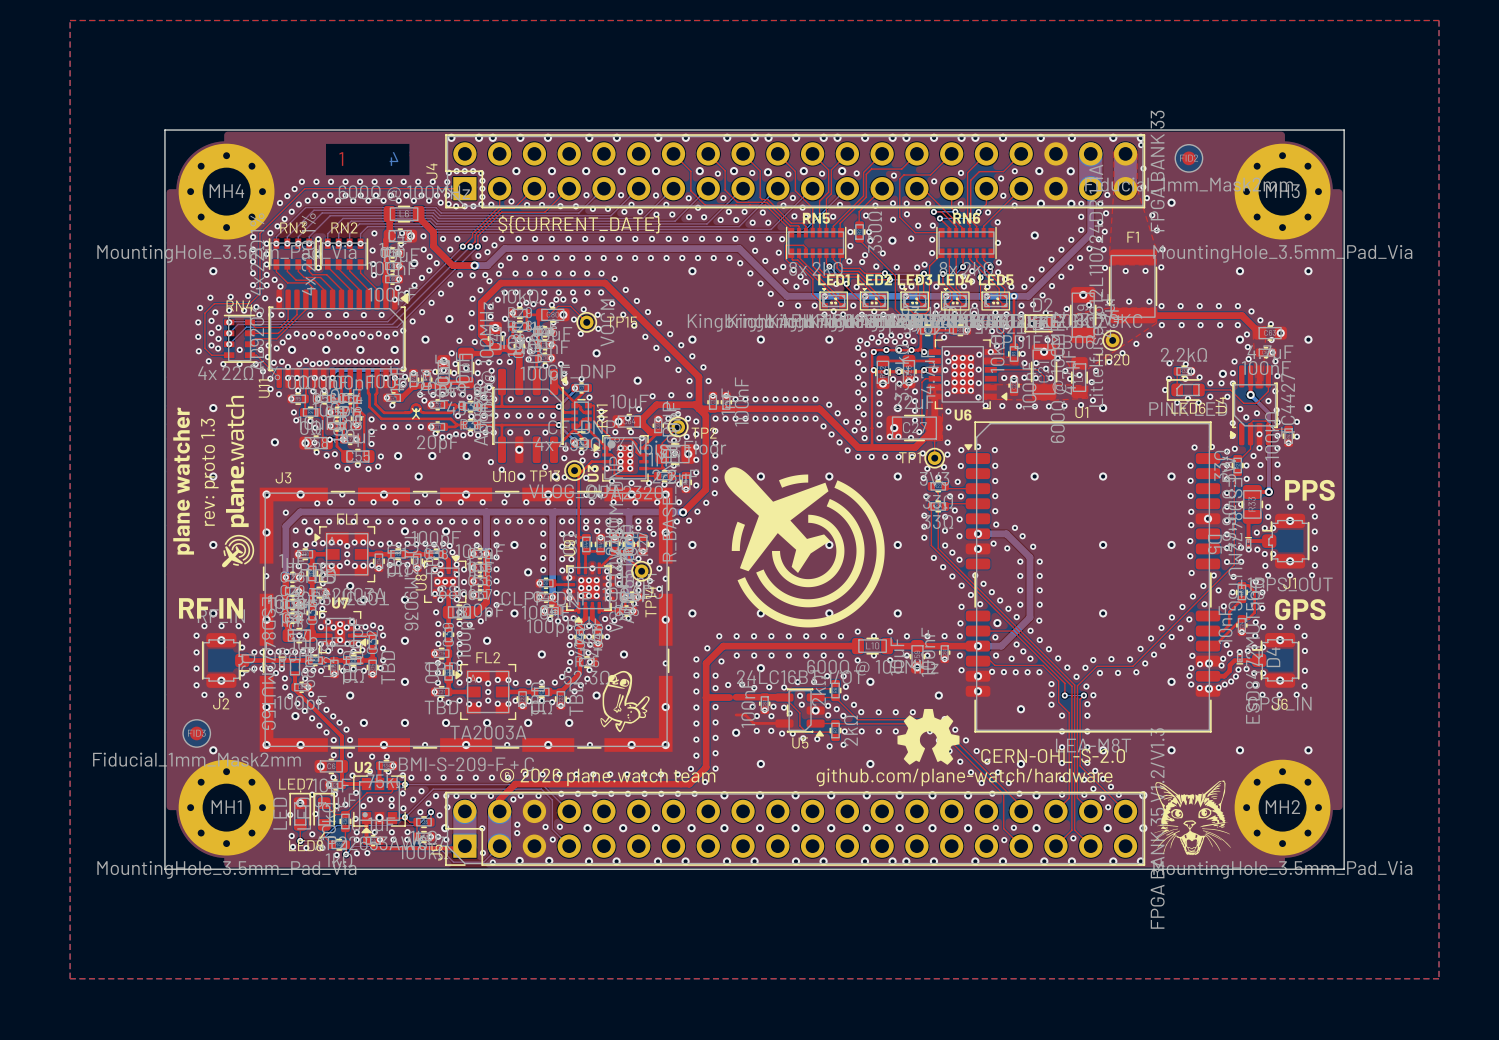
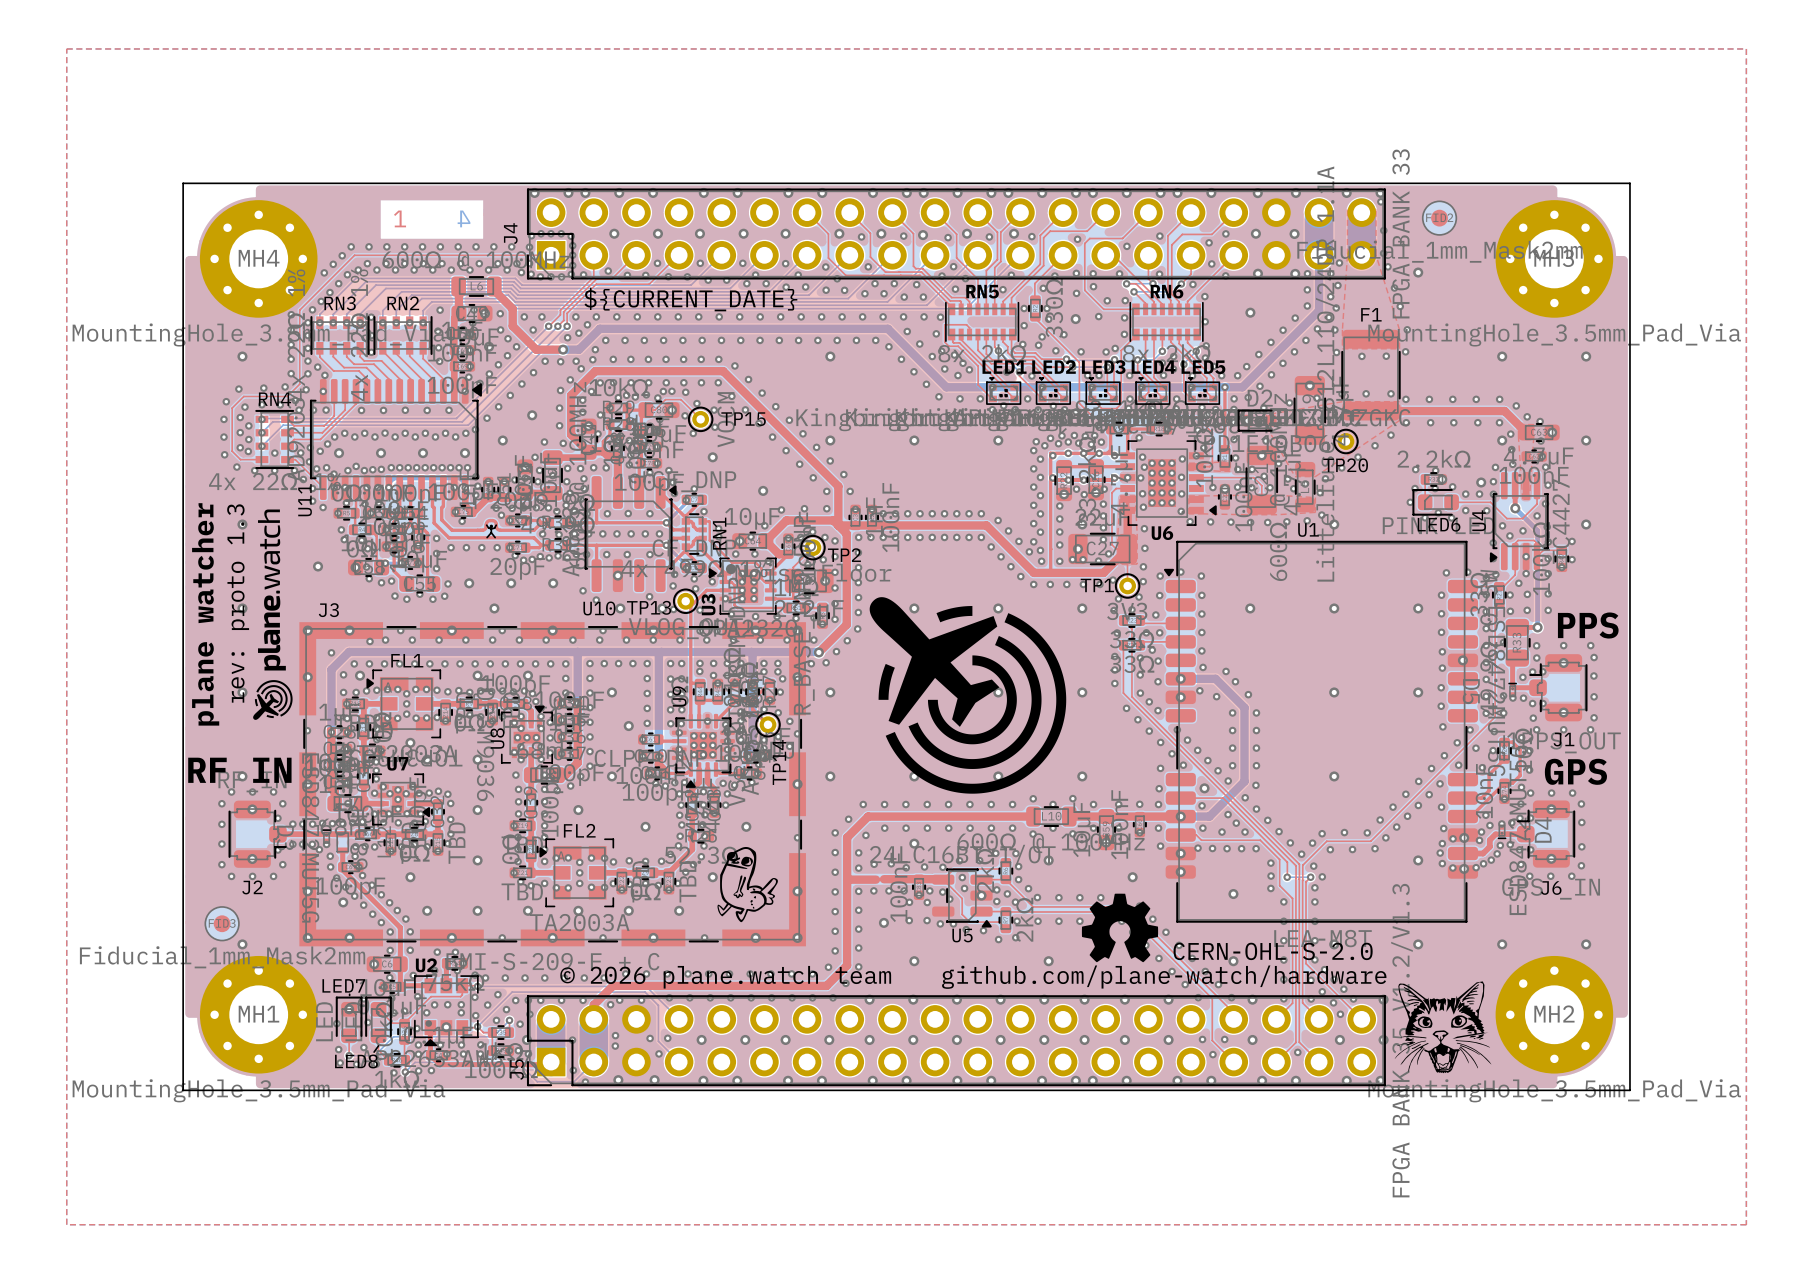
via: none -> (873, 890)
via: none -> (888, 890)
top track: (736, 714) (745, 714) (753, 723) (784, 723) -> none

